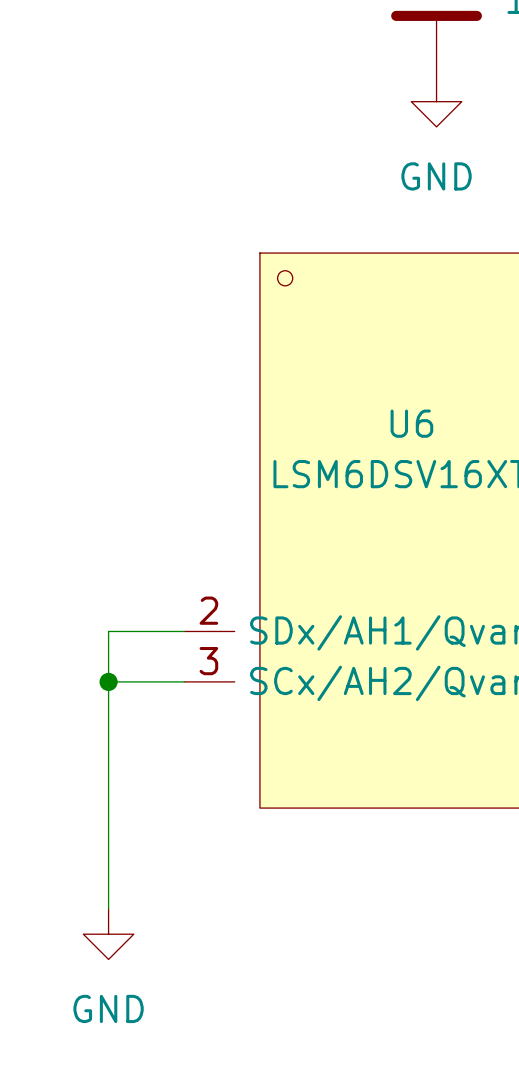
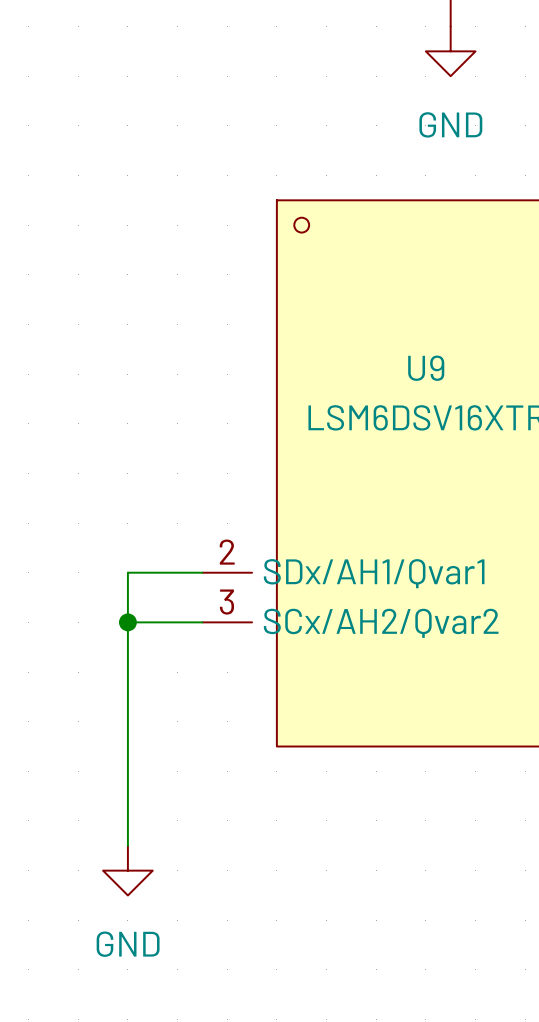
U6 name: U6 (411, 423) -> U9 (426, 368)

